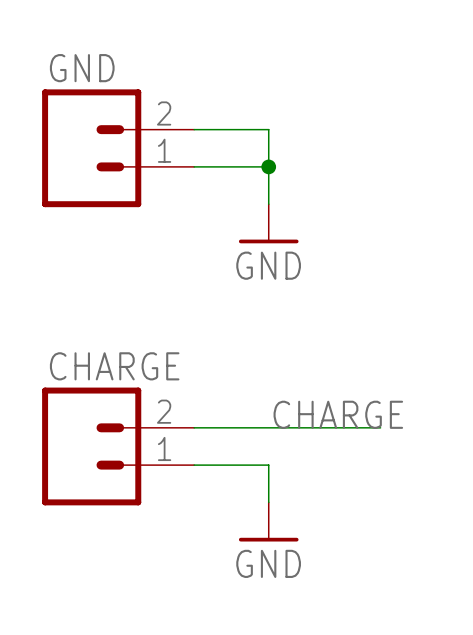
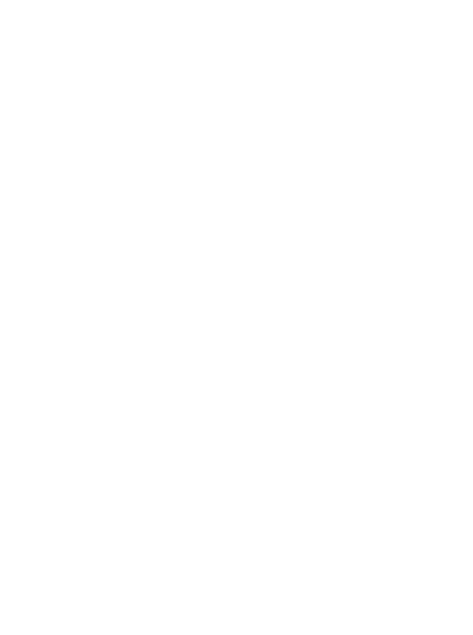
wire: (194, 129) (268, 129) (268, 204) -> none
GND: (118, 148) -> none
wire: (194, 166) (268, 166) -> none
junction: (268, 166) -> none
power symbol: GND (268, 223) -> none
label: CHARGE (338, 414) -> none
wire: (194, 427) (380, 427) -> none
CHARGE: (118, 446) -> none
wire: (194, 465) (268, 465) (268, 502) -> none
power symbol: GND (268, 521) -> none

